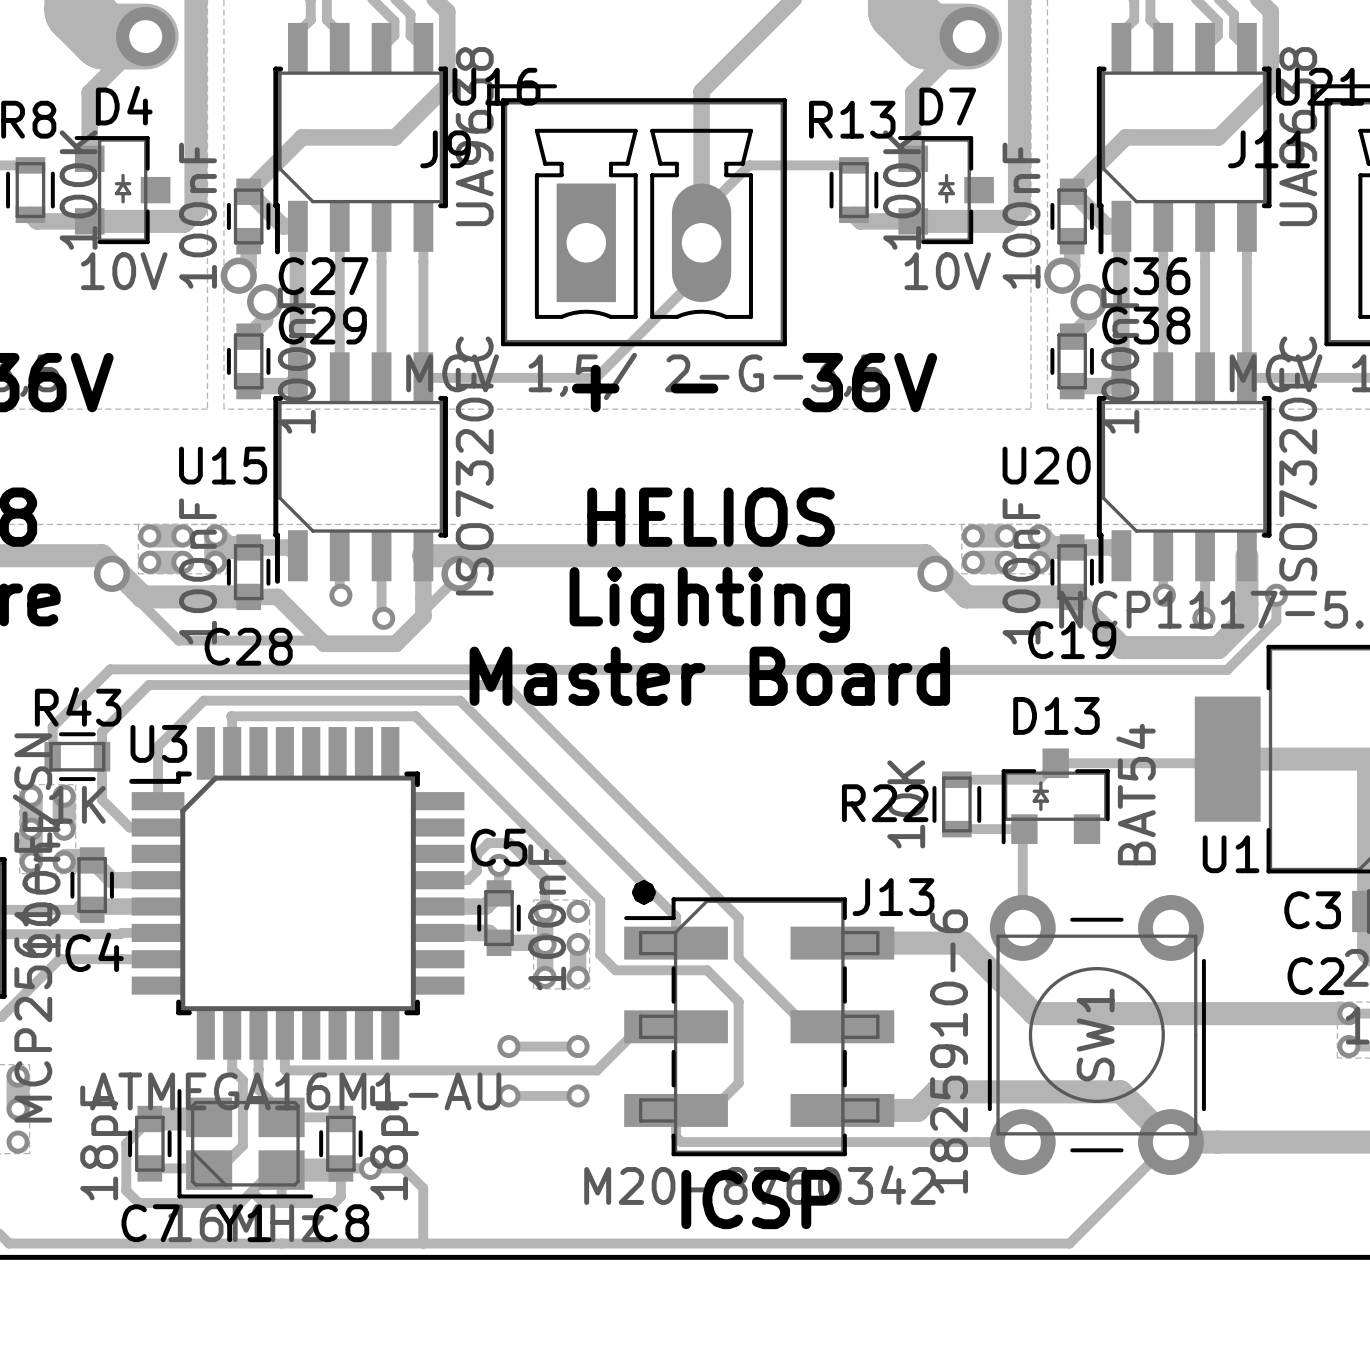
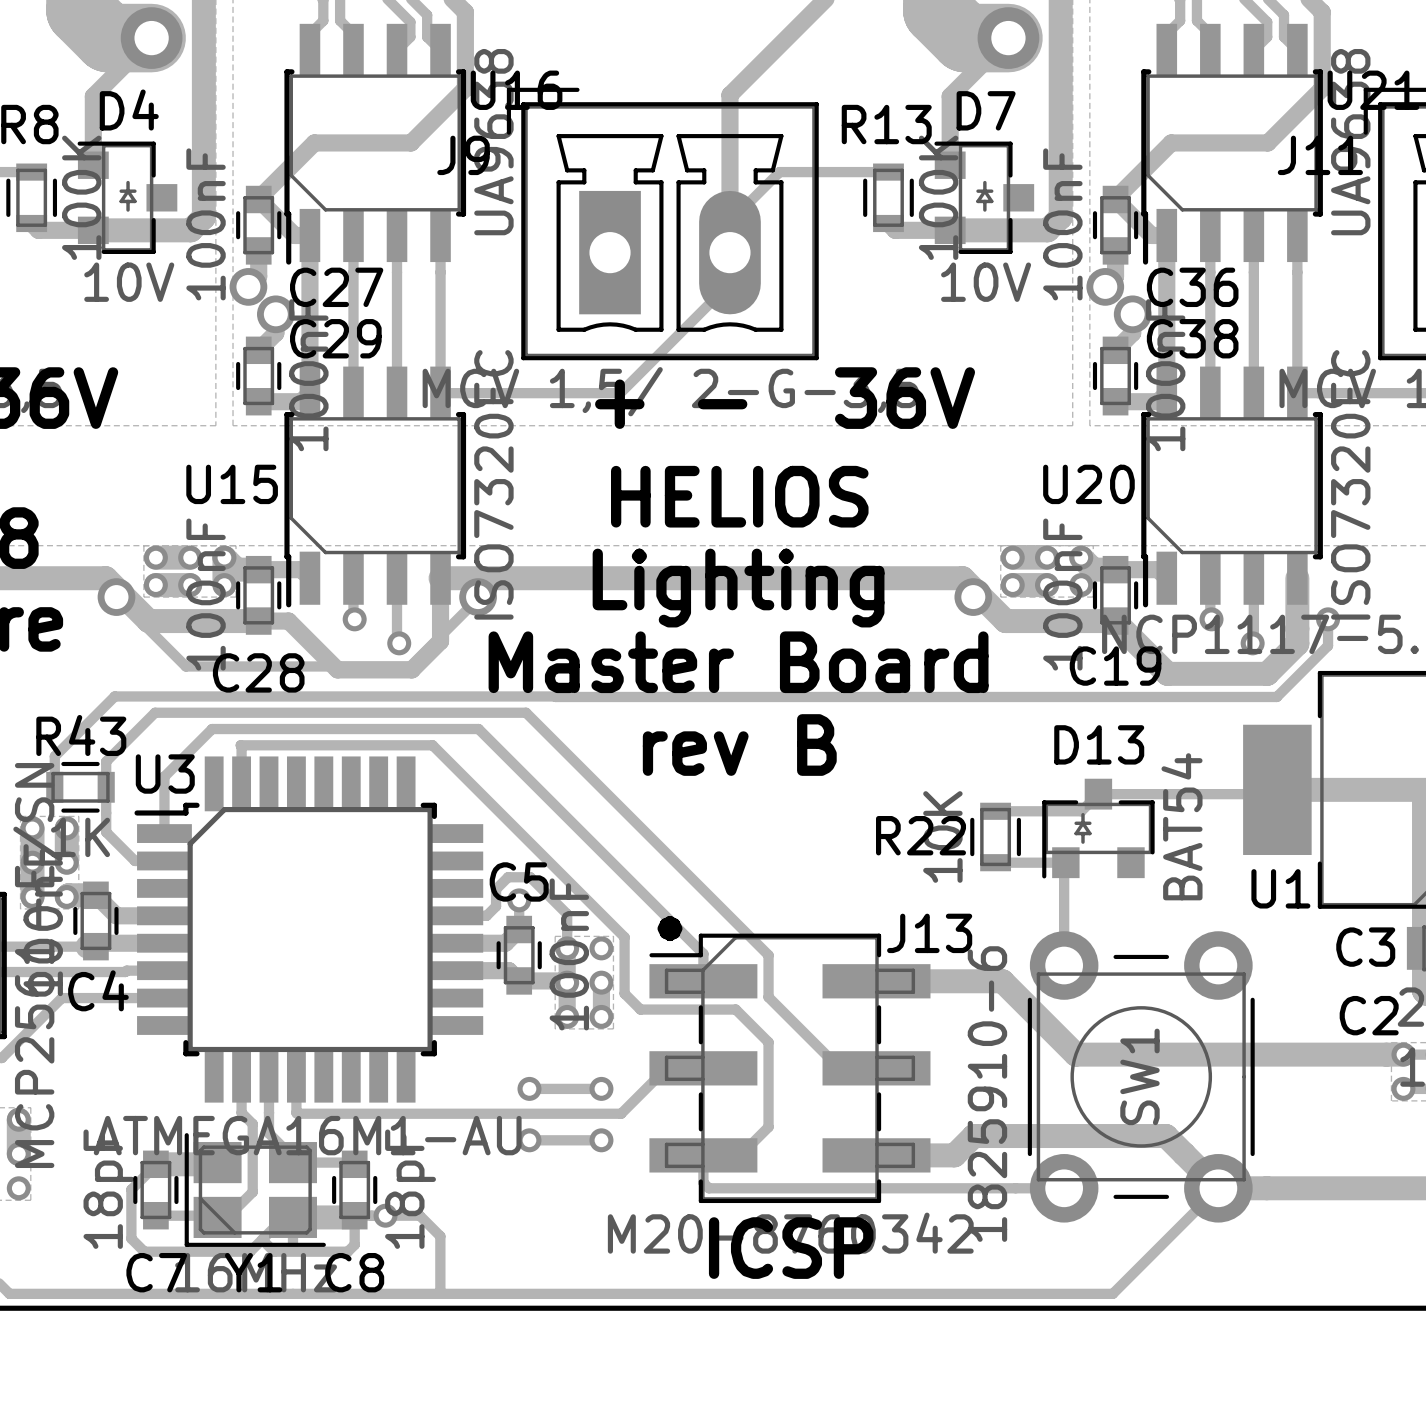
text position: HELIOS (711, 517) -> HELIOS (739, 496)
text position: Lighting (709, 604) -> Lighting (738, 588)
text position: Master Board (709, 676) -> Master Board (738, 662)
text: none -> rev B (739, 745)

